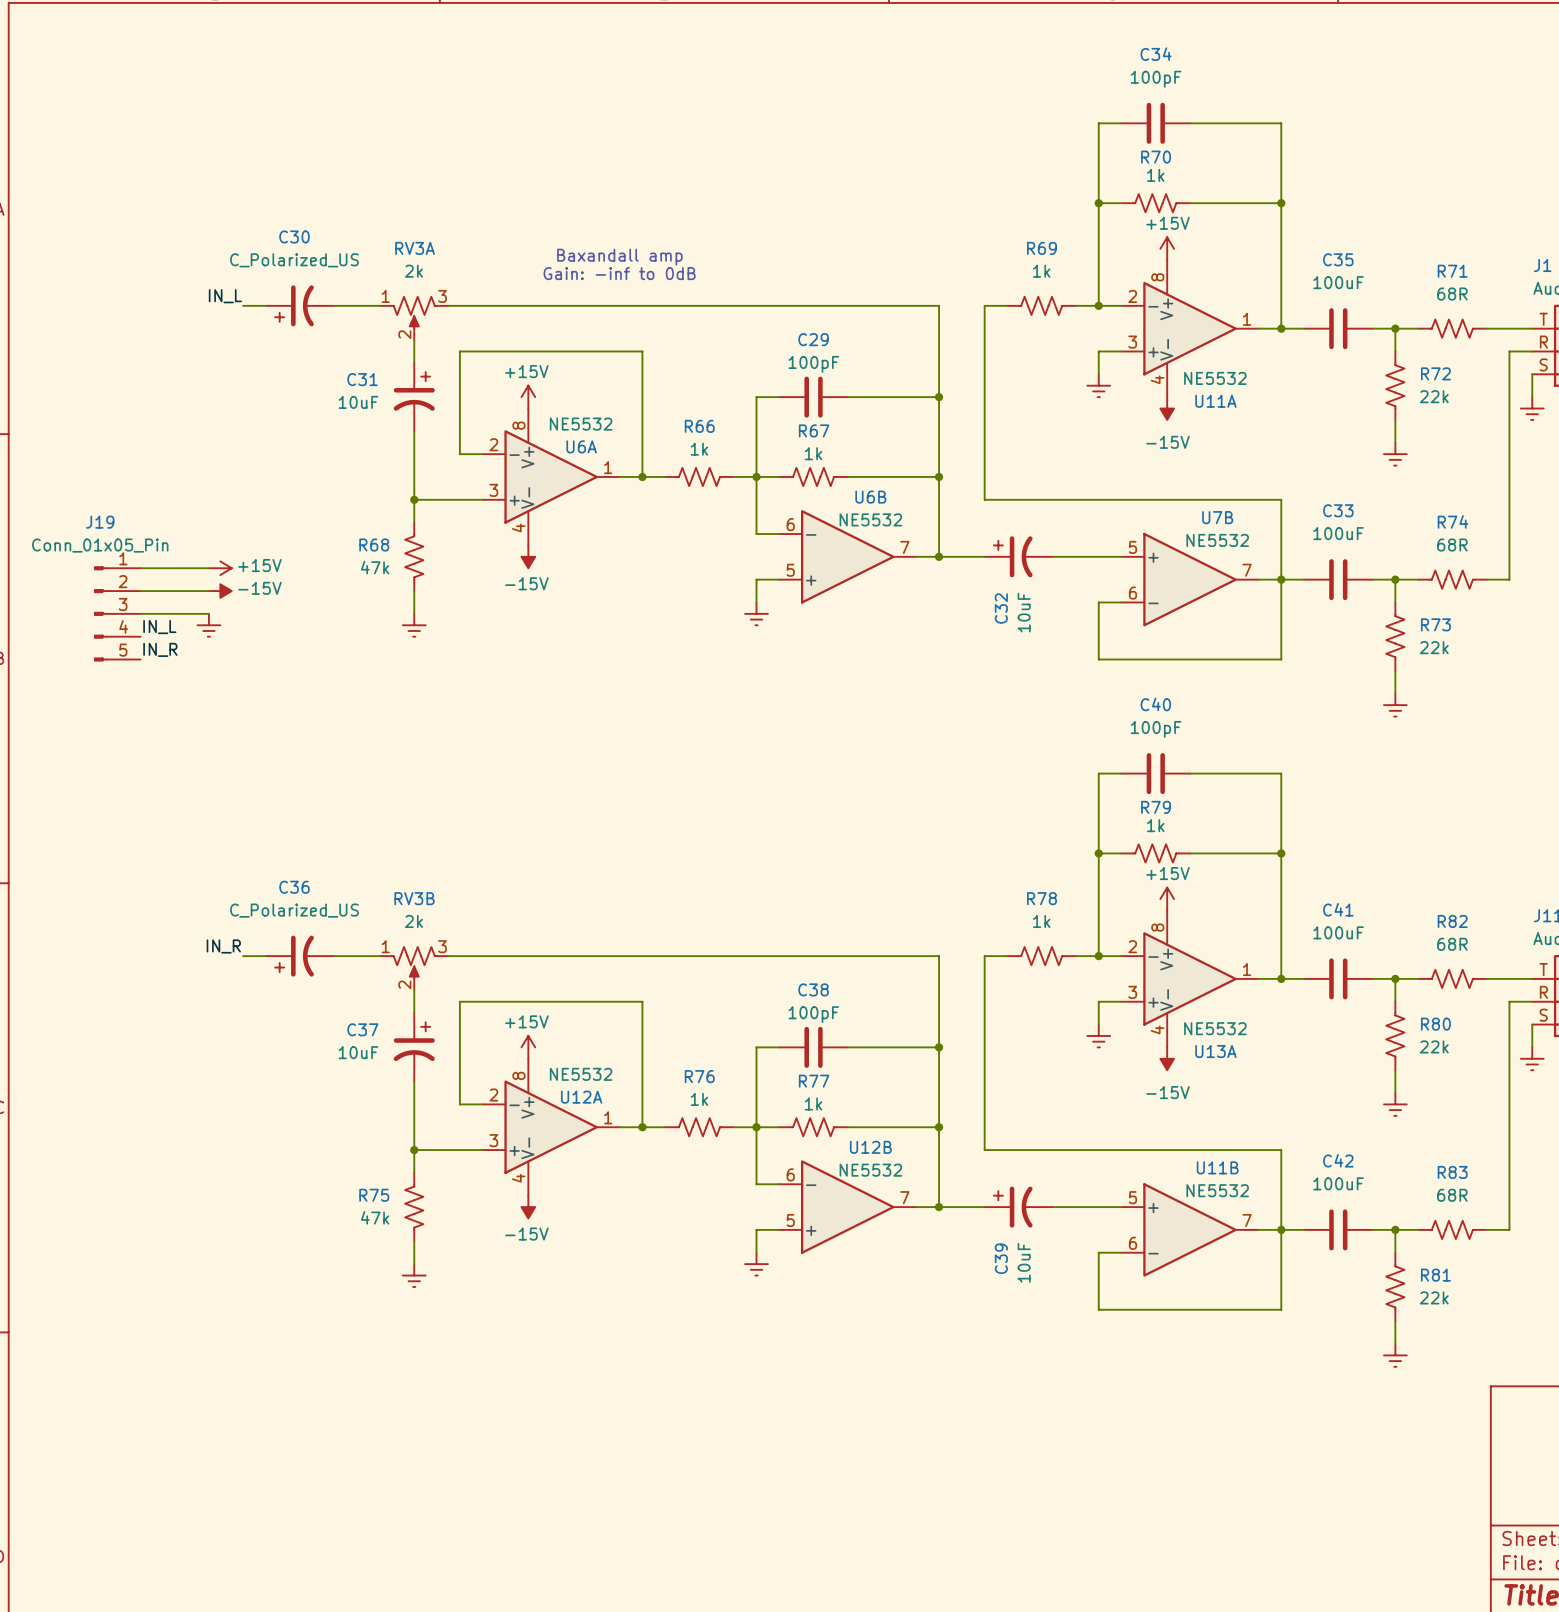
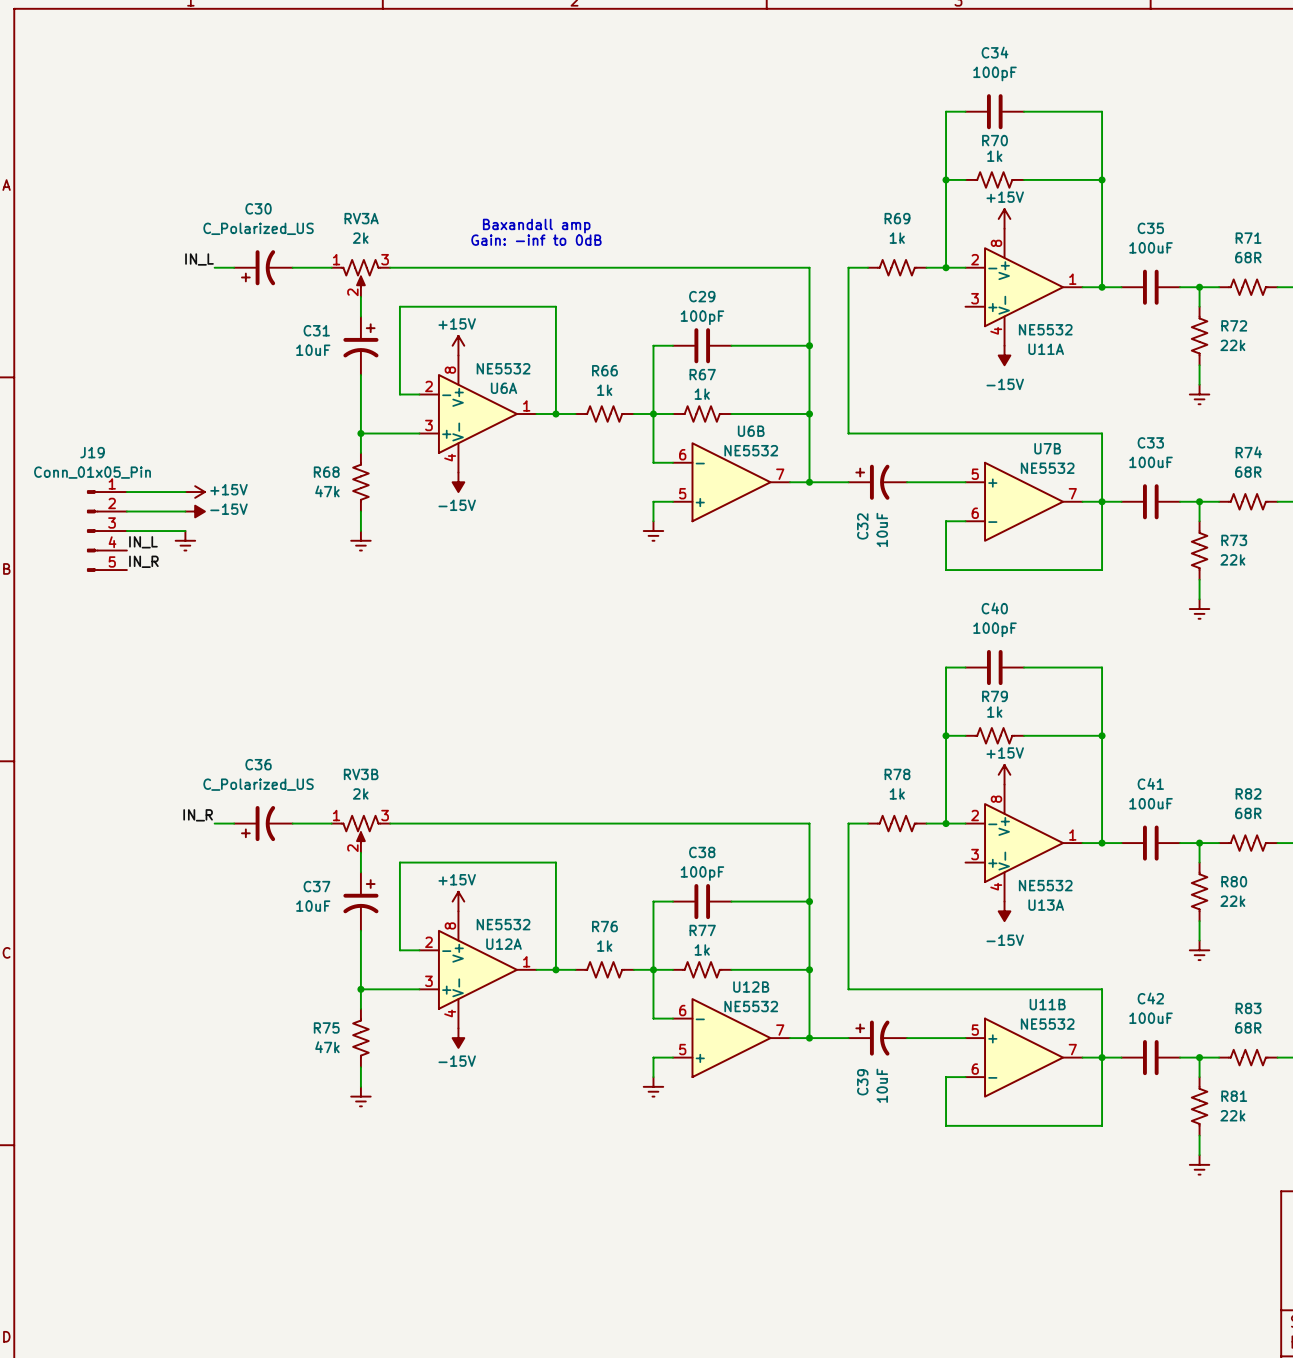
wire: (1121, 351) (1098, 351) (1098, 374) -> none
power symbol: (1098, 385) -> none
wire: (1121, 1001) (1098, 1001) (1098, 1024) -> none
power symbol: (1098, 1035) -> none

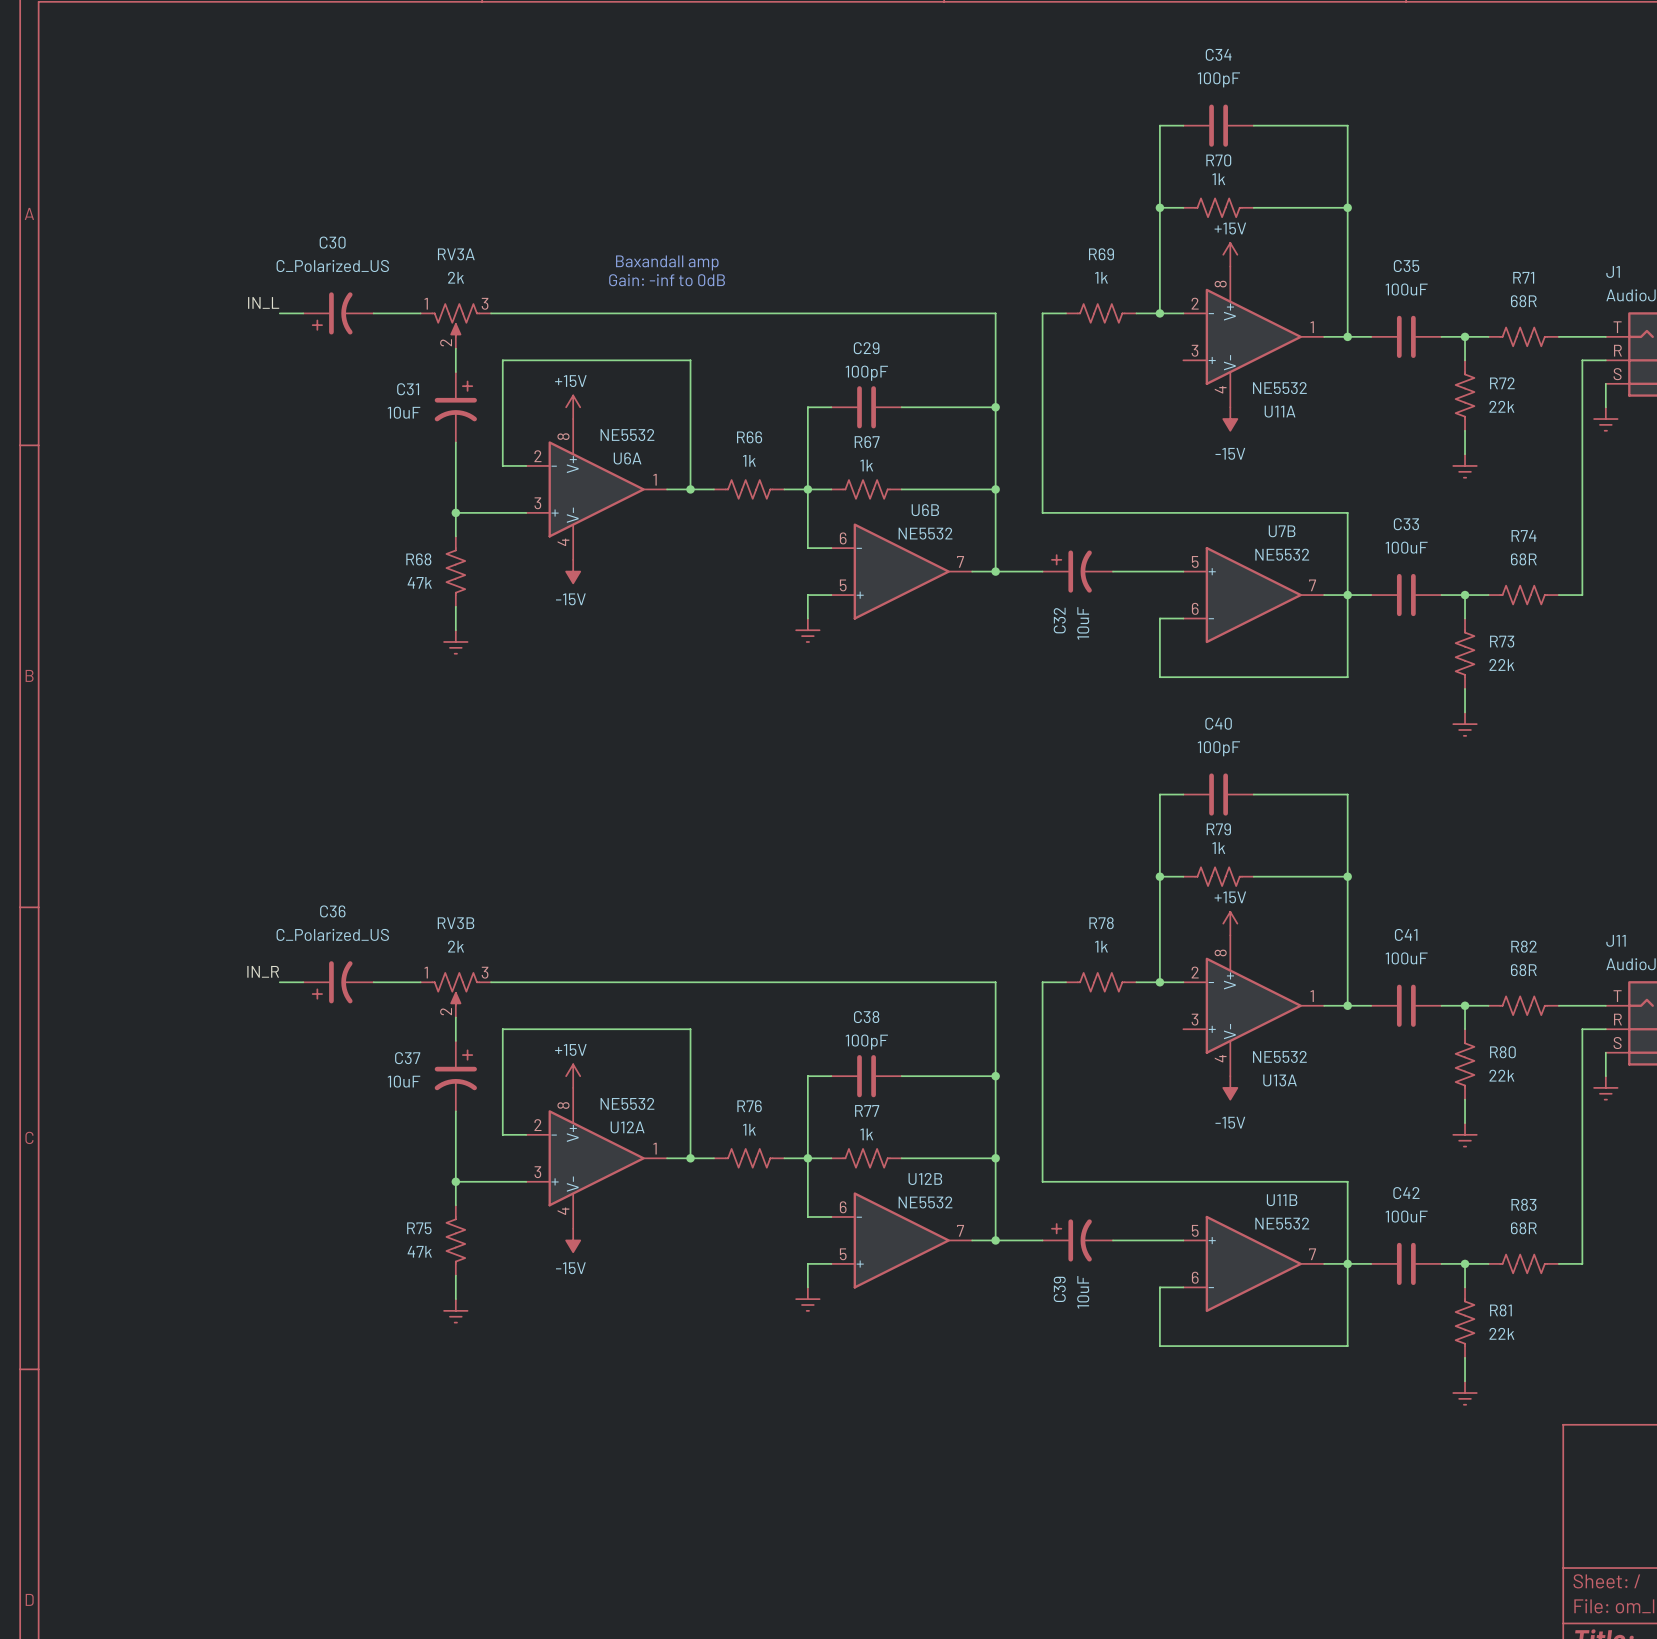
wire: (126, 492) (185, 492) -> none
power symbol: +15V (195, 492) -> none
wire: (126, 511) (185, 511) -> none
power symbol: -15V (195, 511) -> none
J19: Conn_01x05_Pin (107, 531) -> none
wire: (126, 531) (185, 531) -> none
power symbol: (185, 540) -> none
label: IN_L (143, 542) -> none
label: IN_R (143, 561) -> none

